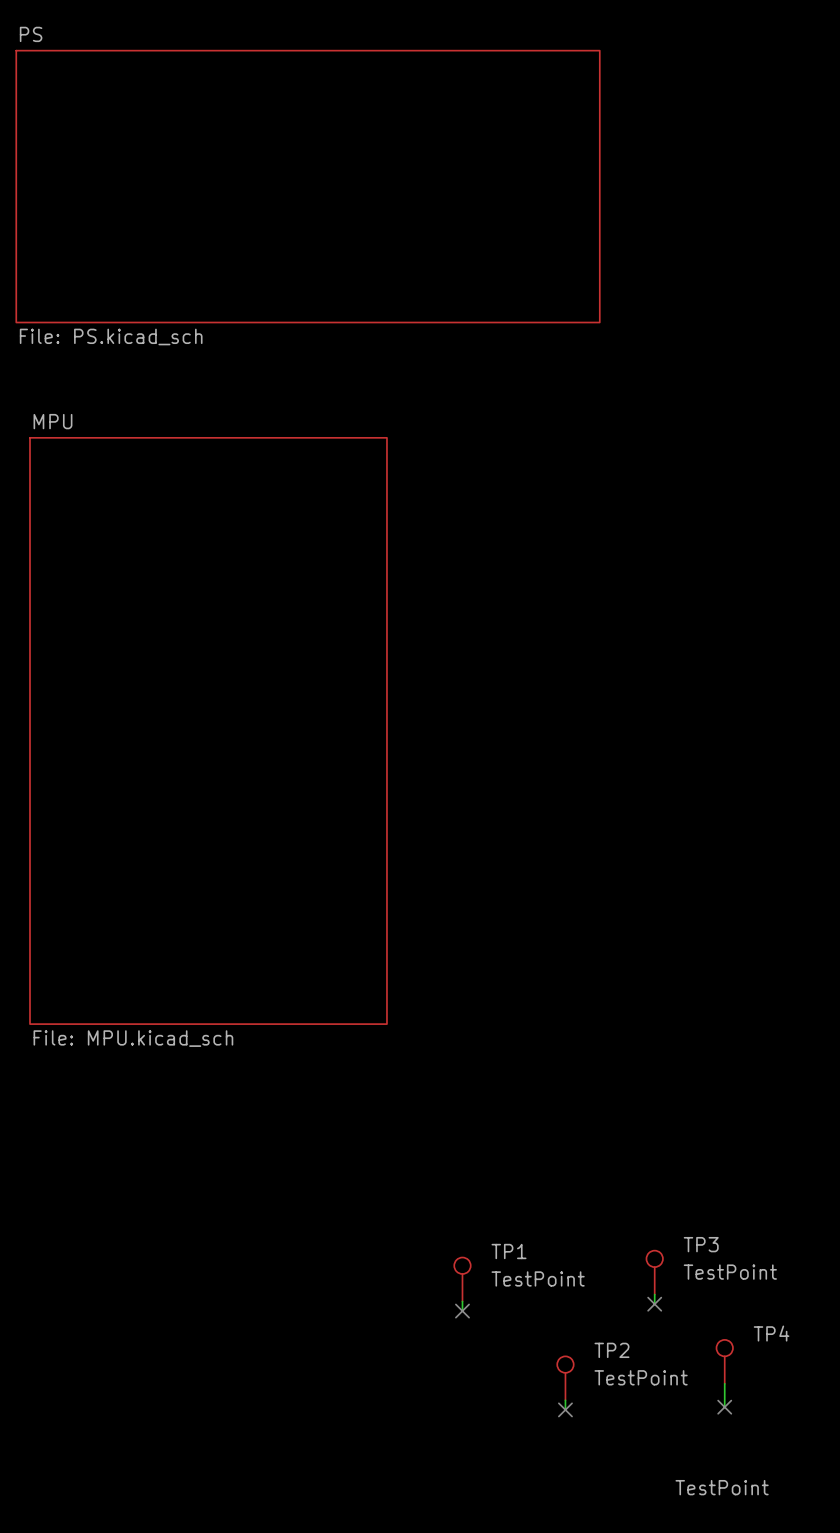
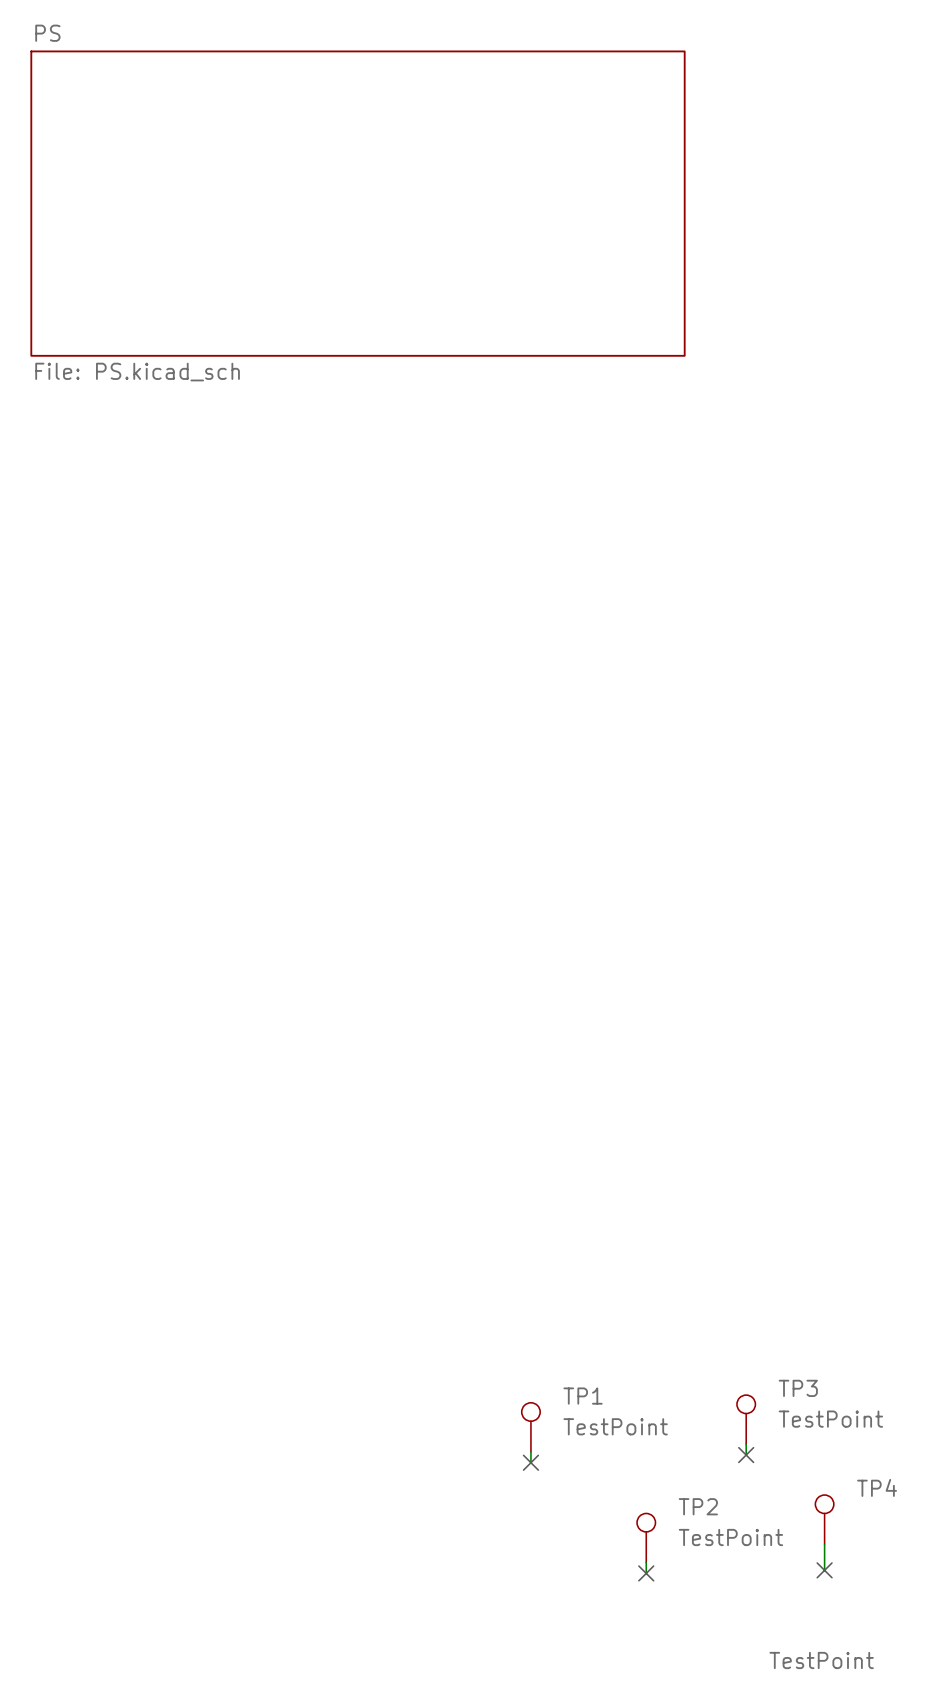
sheet MPU: File: MPU.kicad_sch (208, 730) -> none

